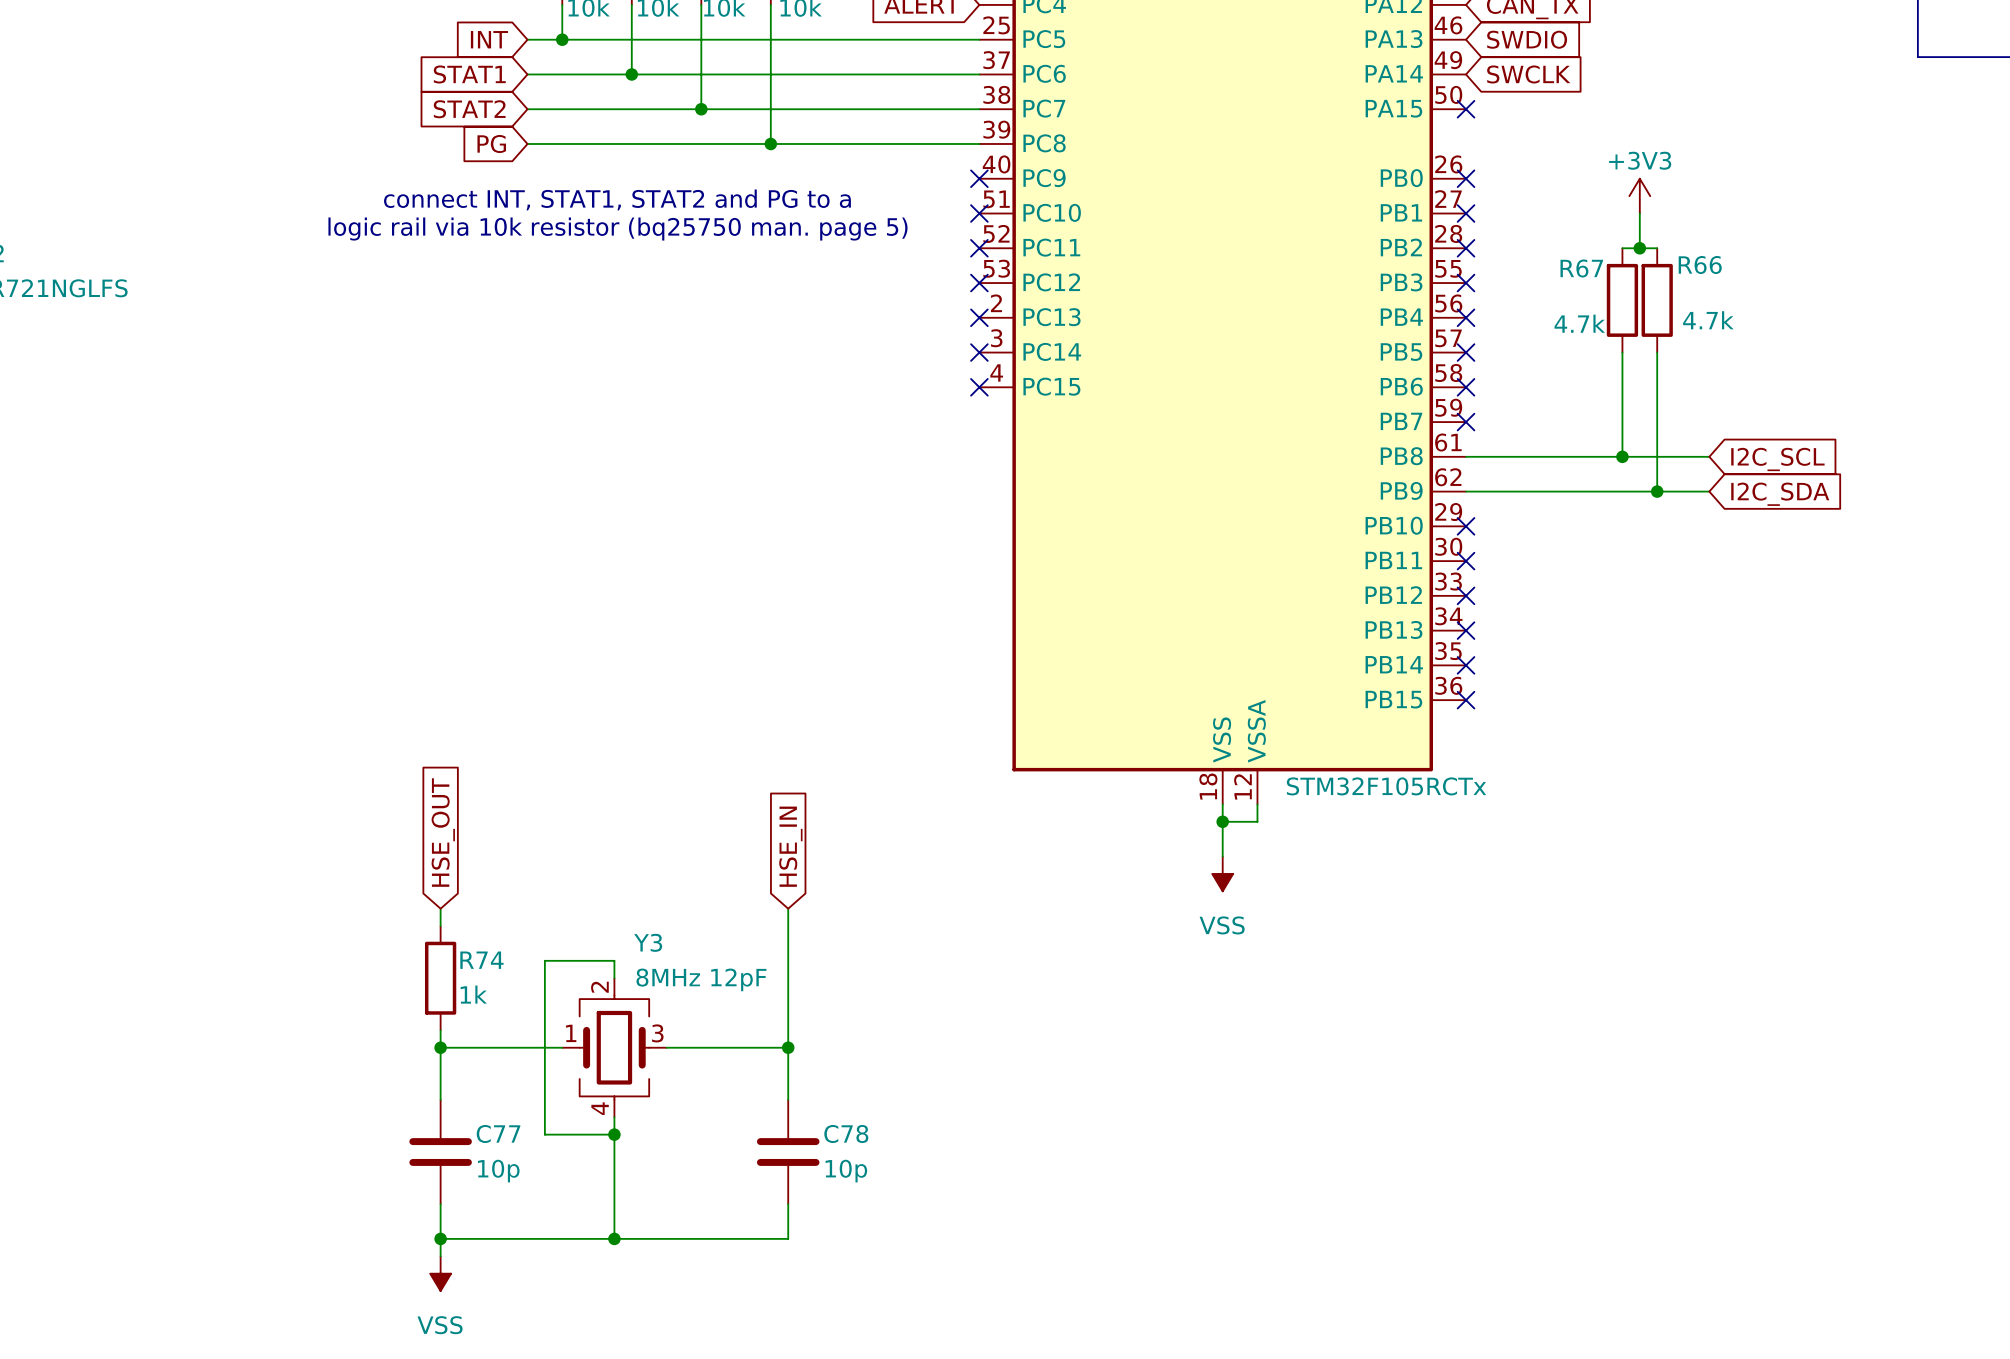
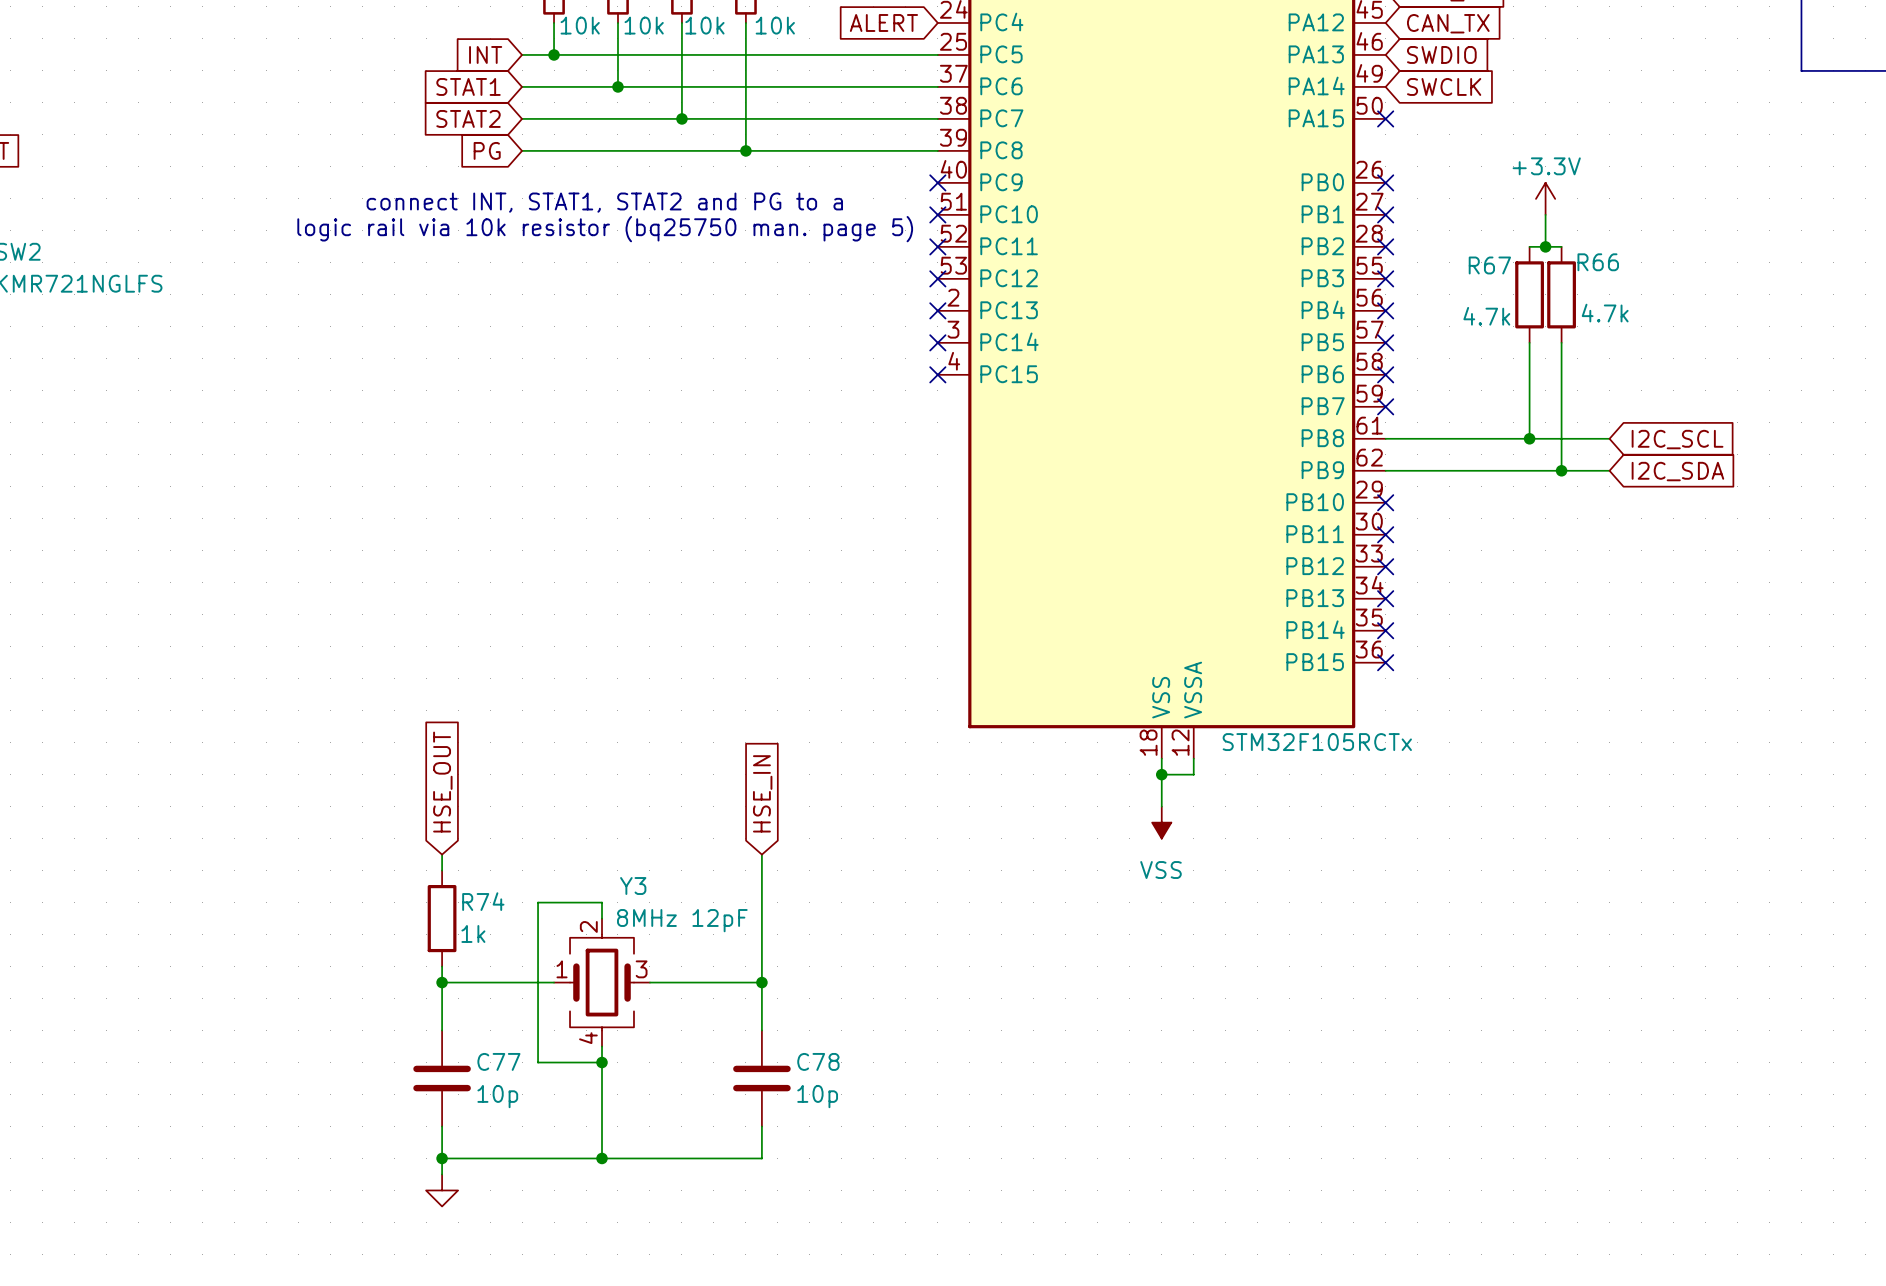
power symbol: +3V3 (1639, 196) -> +3.3V (1545, 198)
power symbol shape: [430, 1256, 452, 1292] -> [426, 1174, 459, 1207]
power symbol text: VSS (440, 1325) -> none

